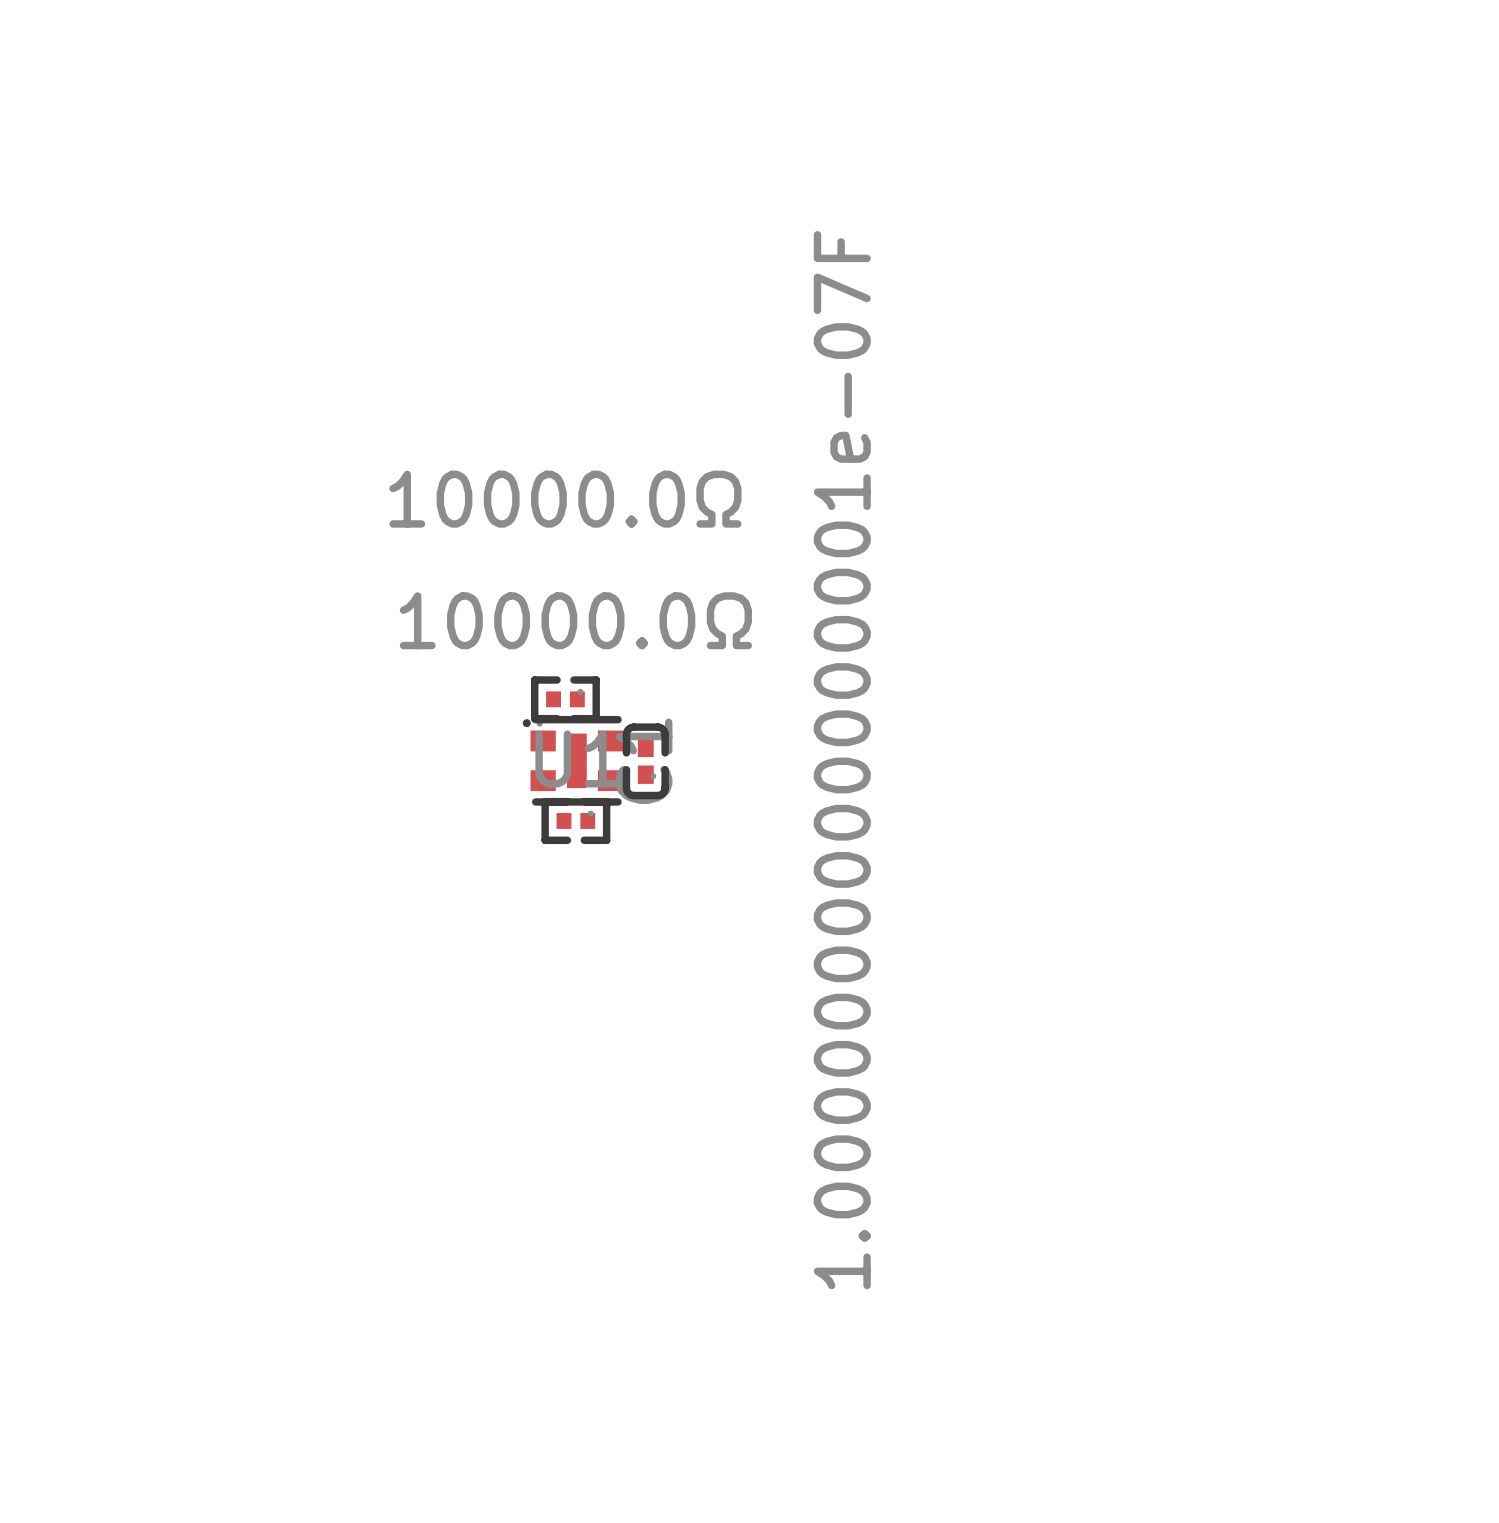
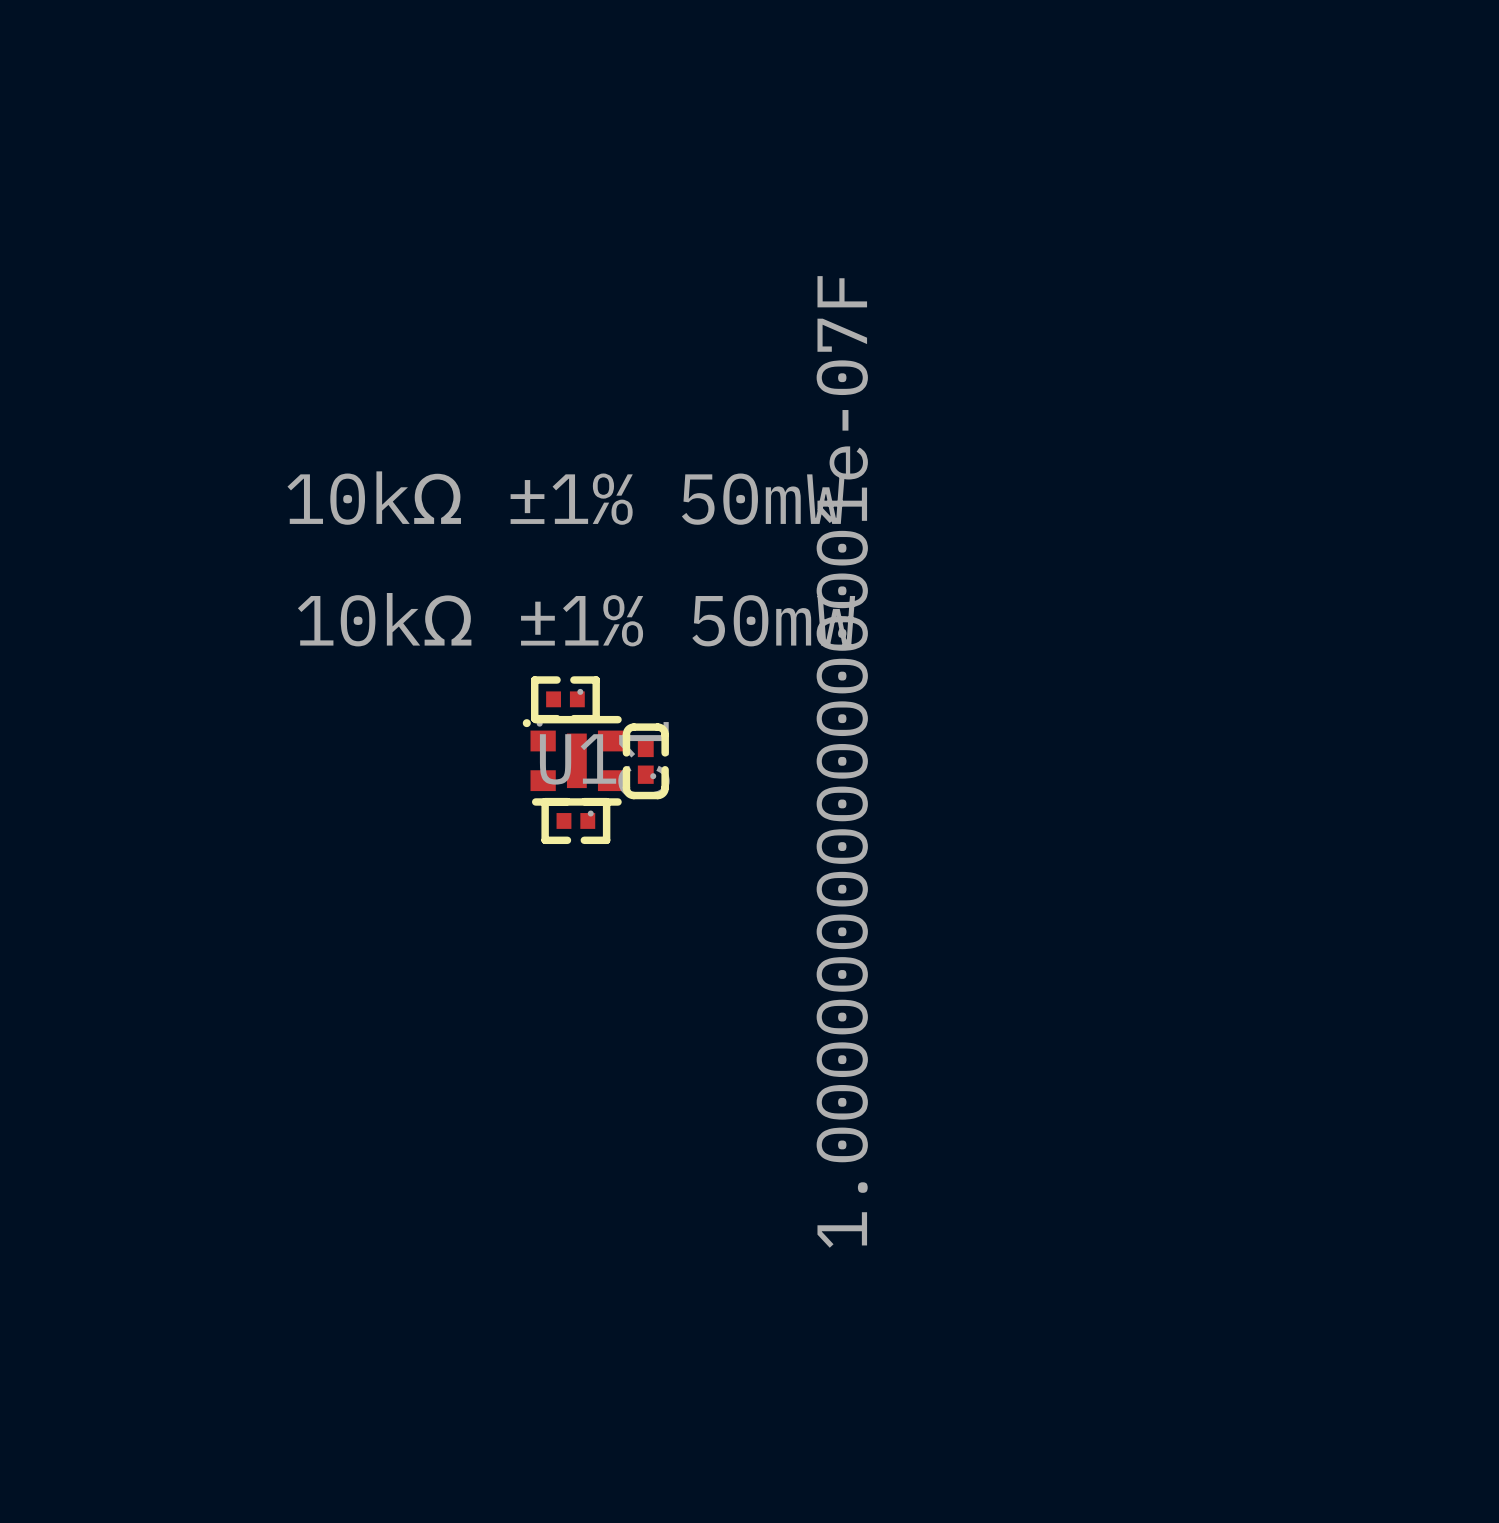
part value: 10000.0Ω (565, 499) -> 10kΩ ±1% 50mW (566, 498)
part value: 10000.0Ω (575, 620) -> 10kΩ ±1% 50mW (576, 619)

